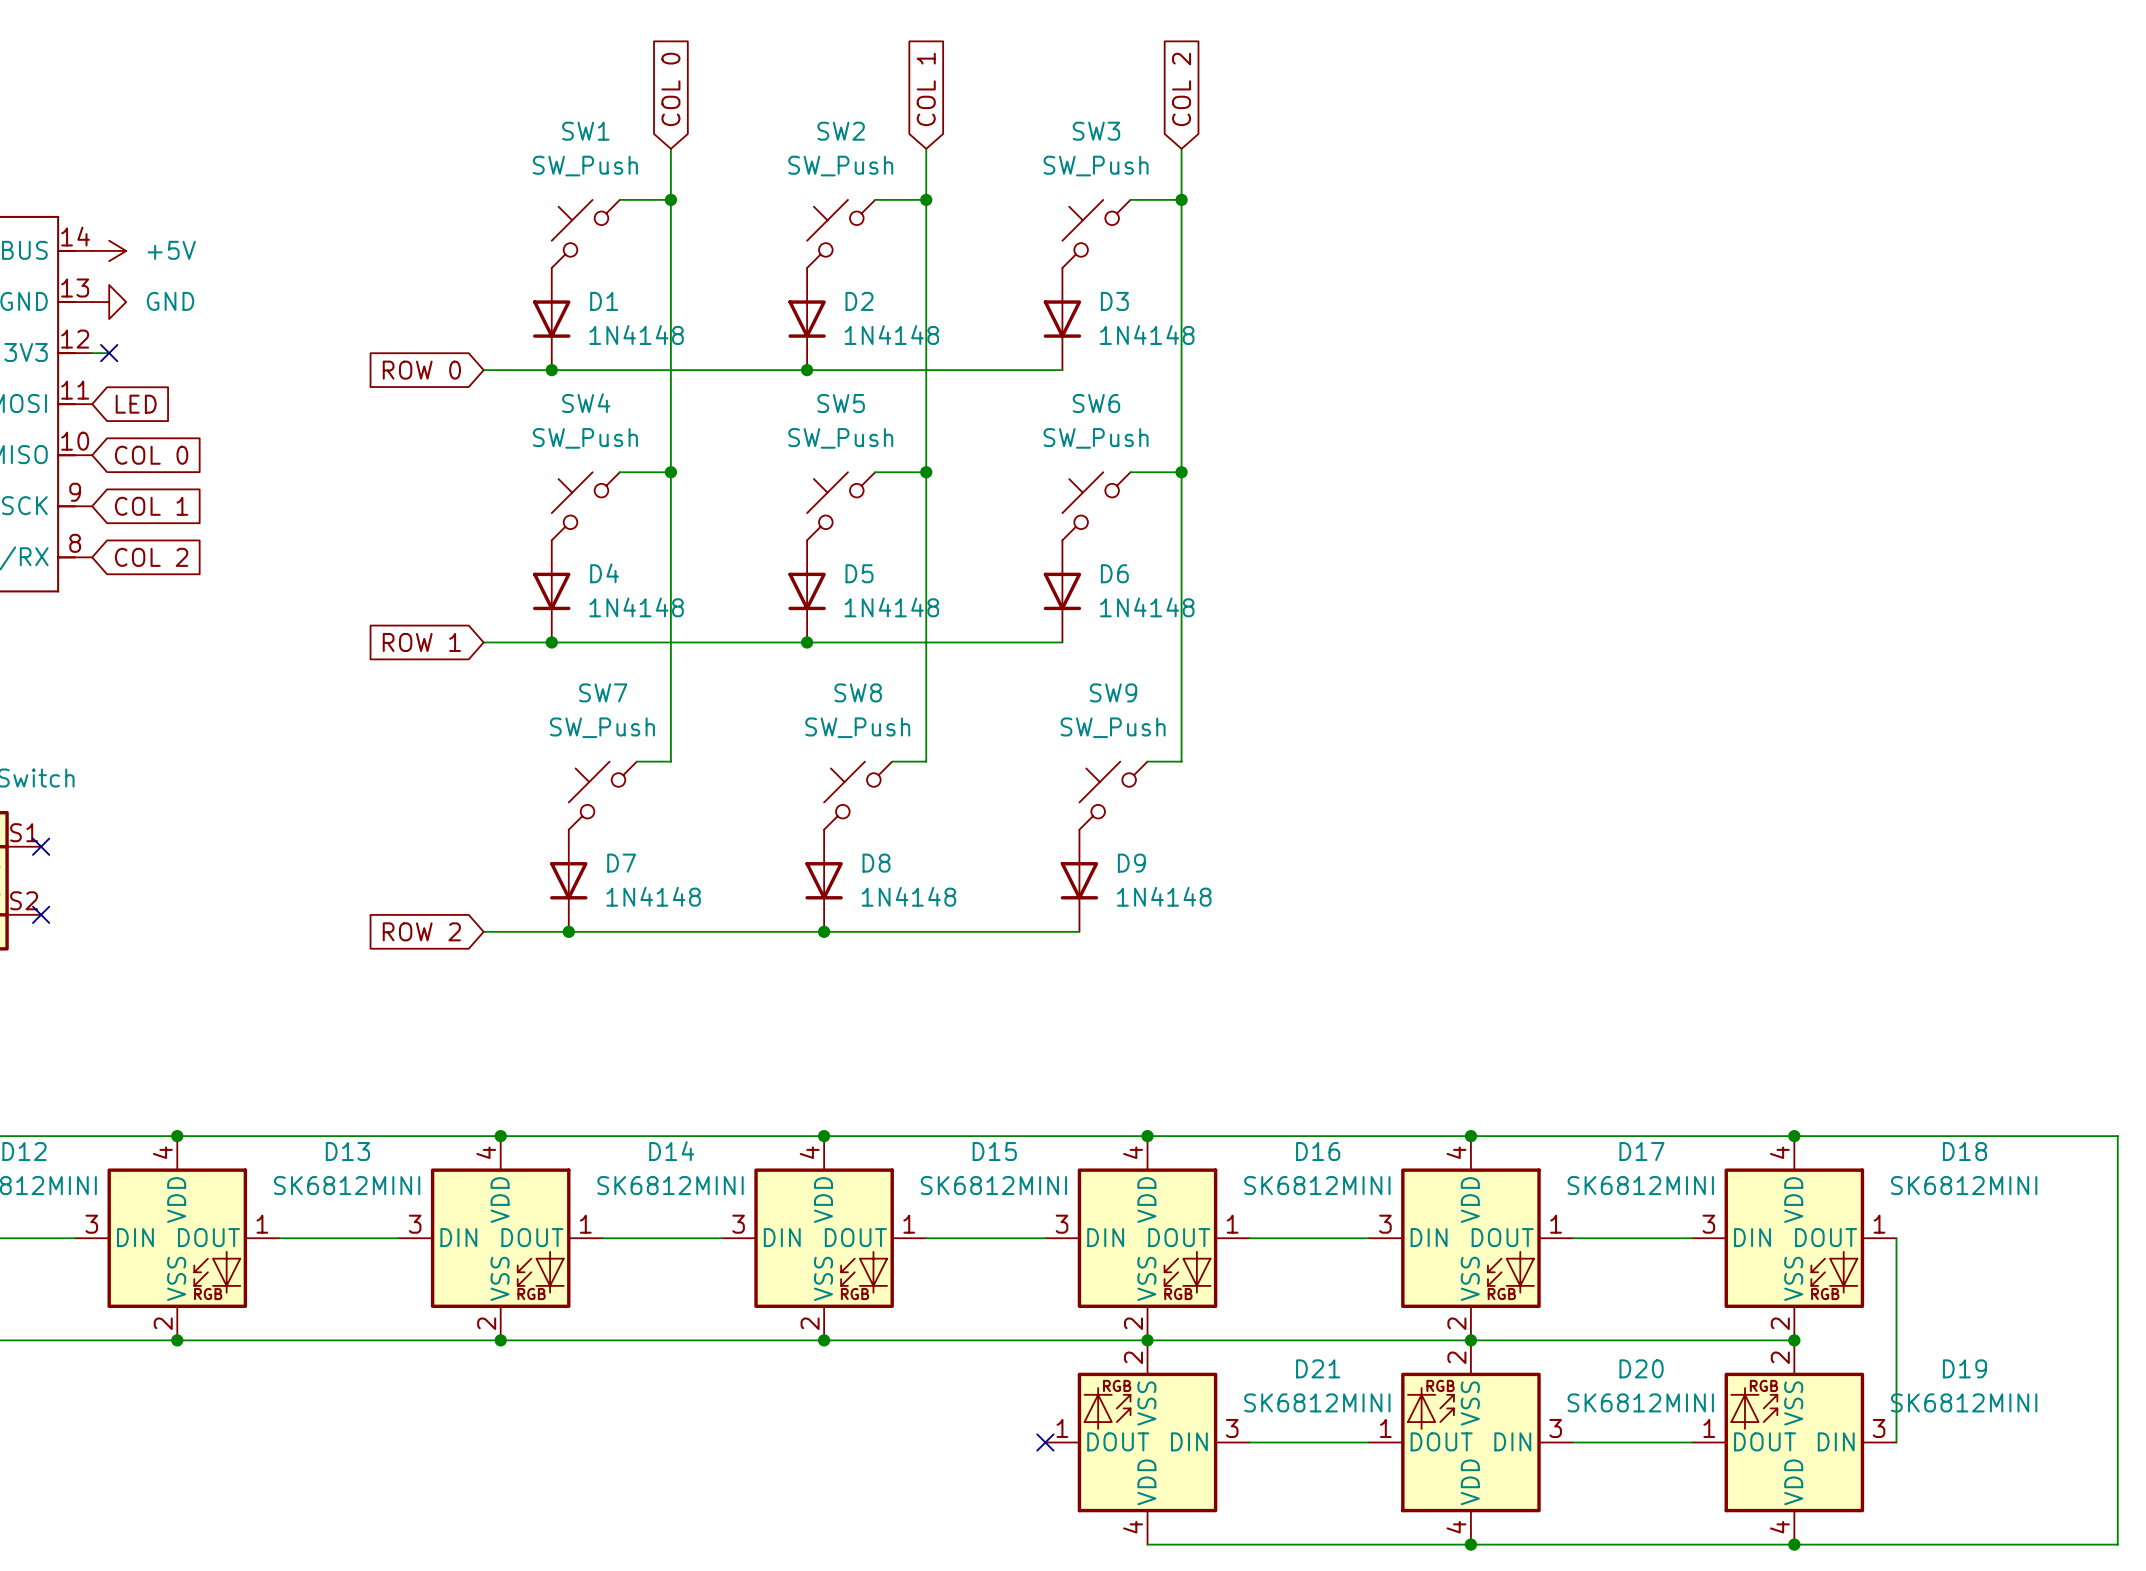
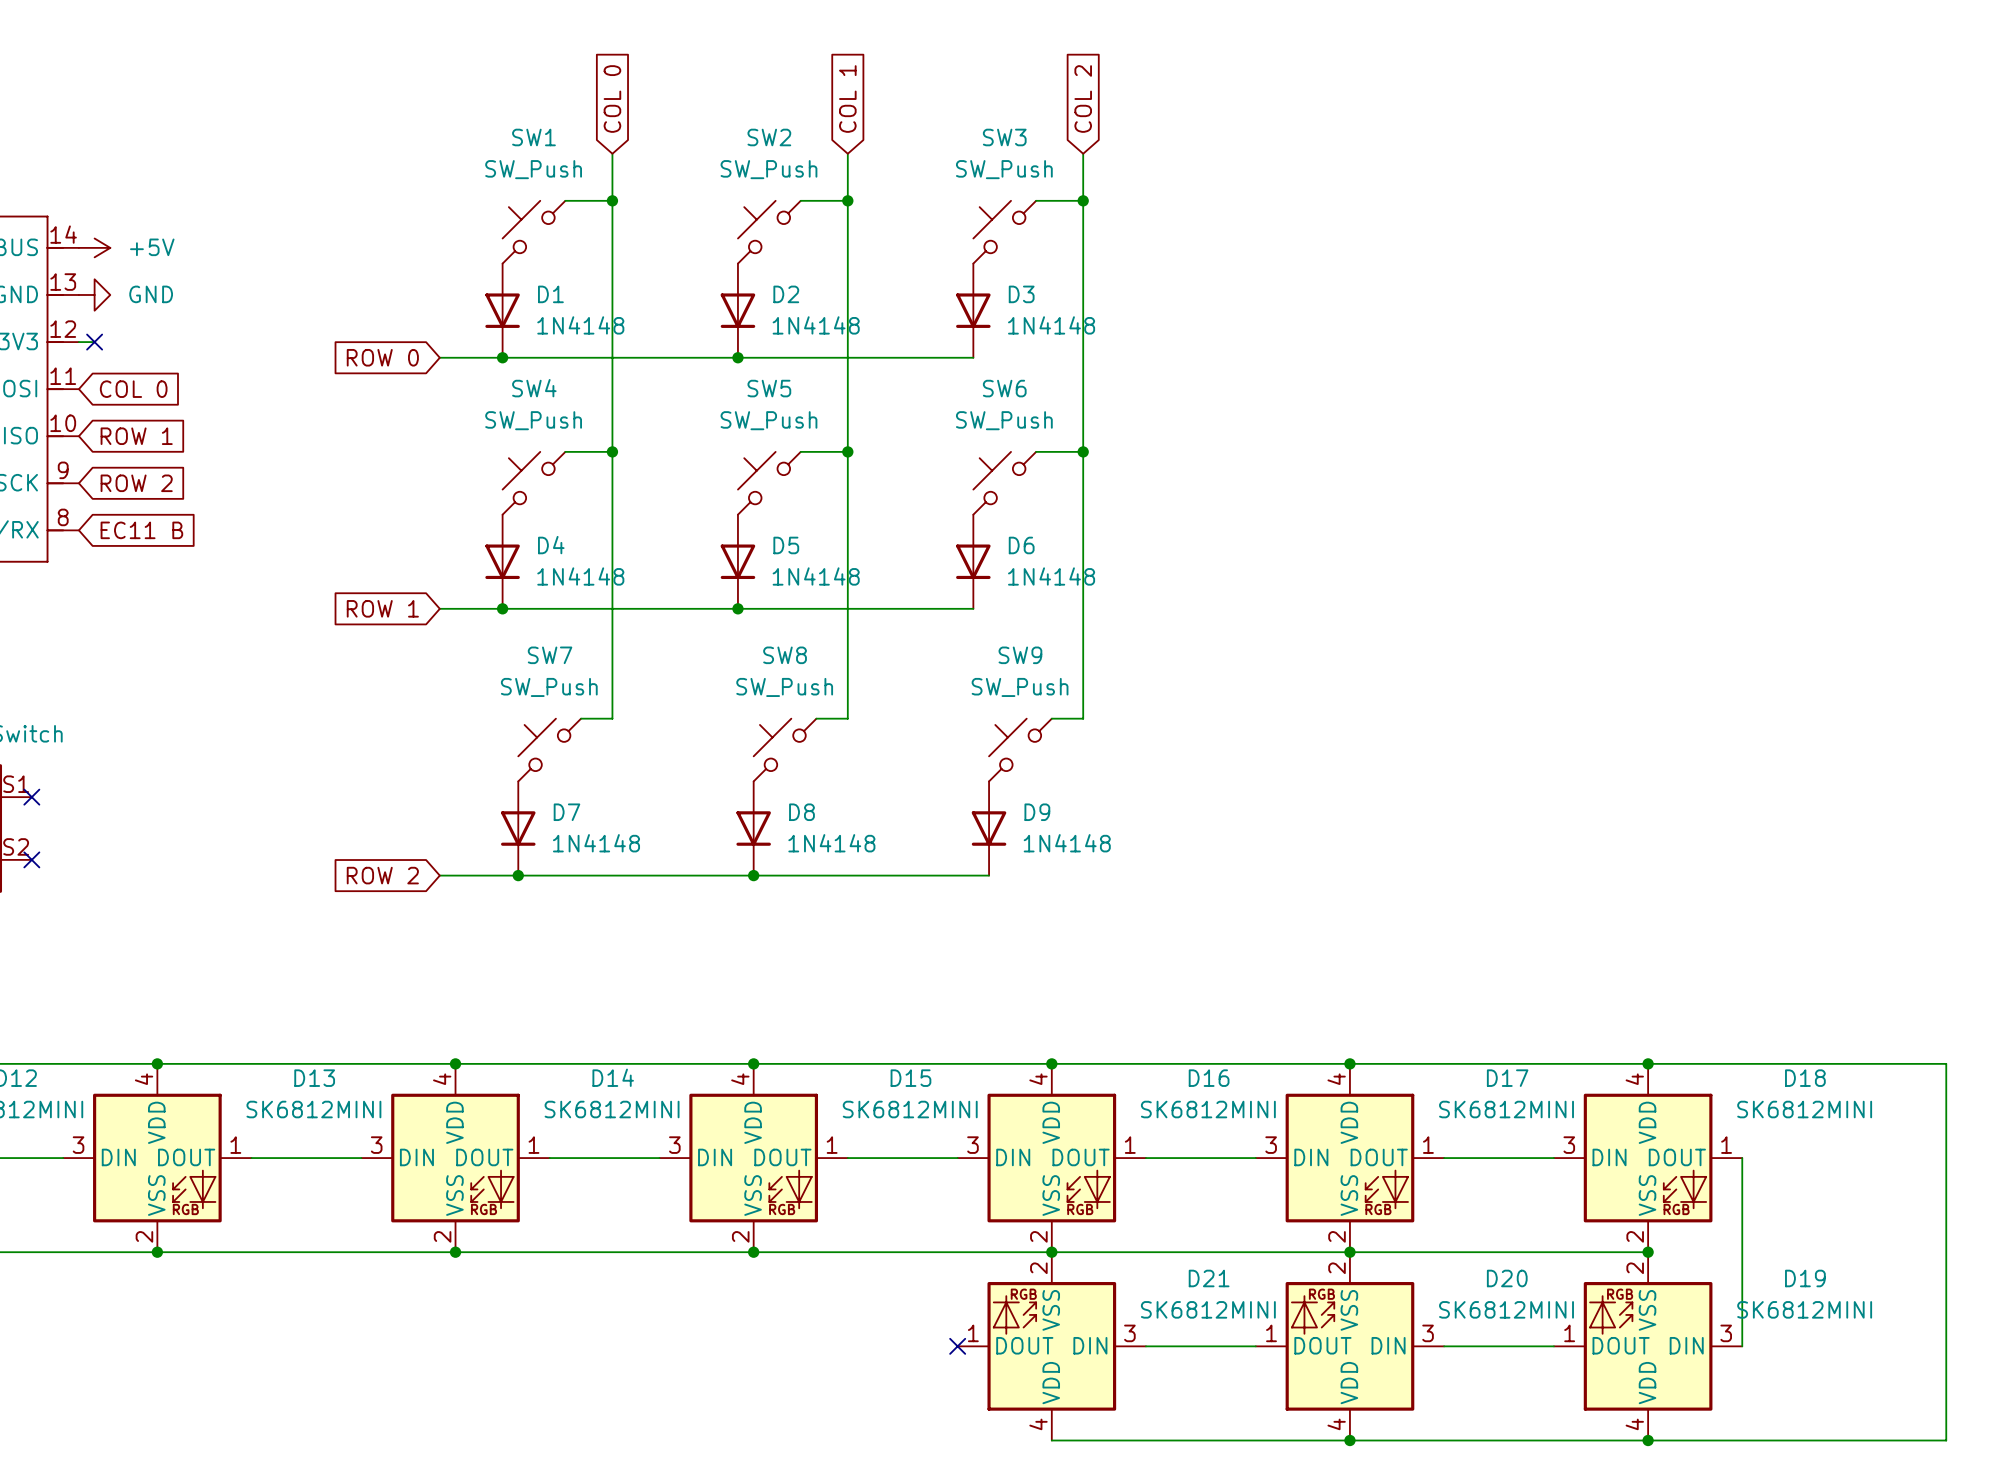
global label: LED (136, 404) -> COL 0 (133, 389)
global label: COL 0 (151, 455) -> ROW 1 (136, 436)
global label: COL 1 (151, 506) -> ROW 2 (136, 483)
global label: COL 2 (151, 557) -> EC11 B (141, 530)

